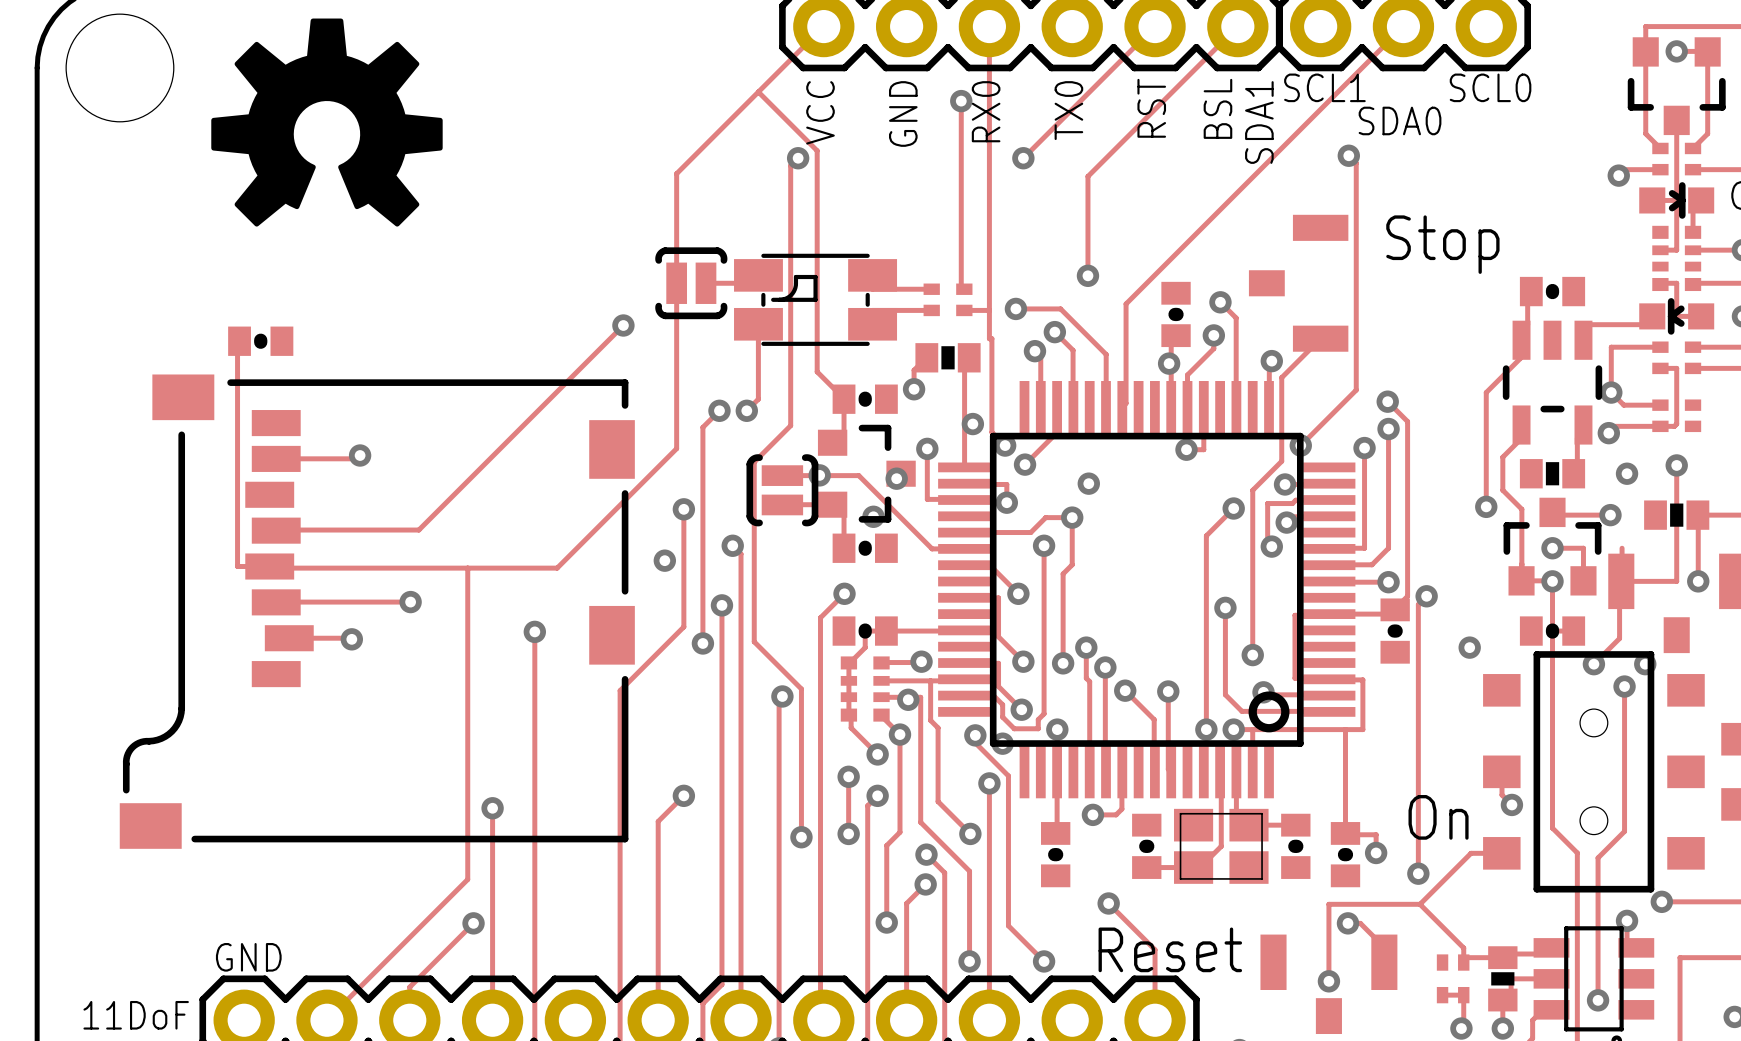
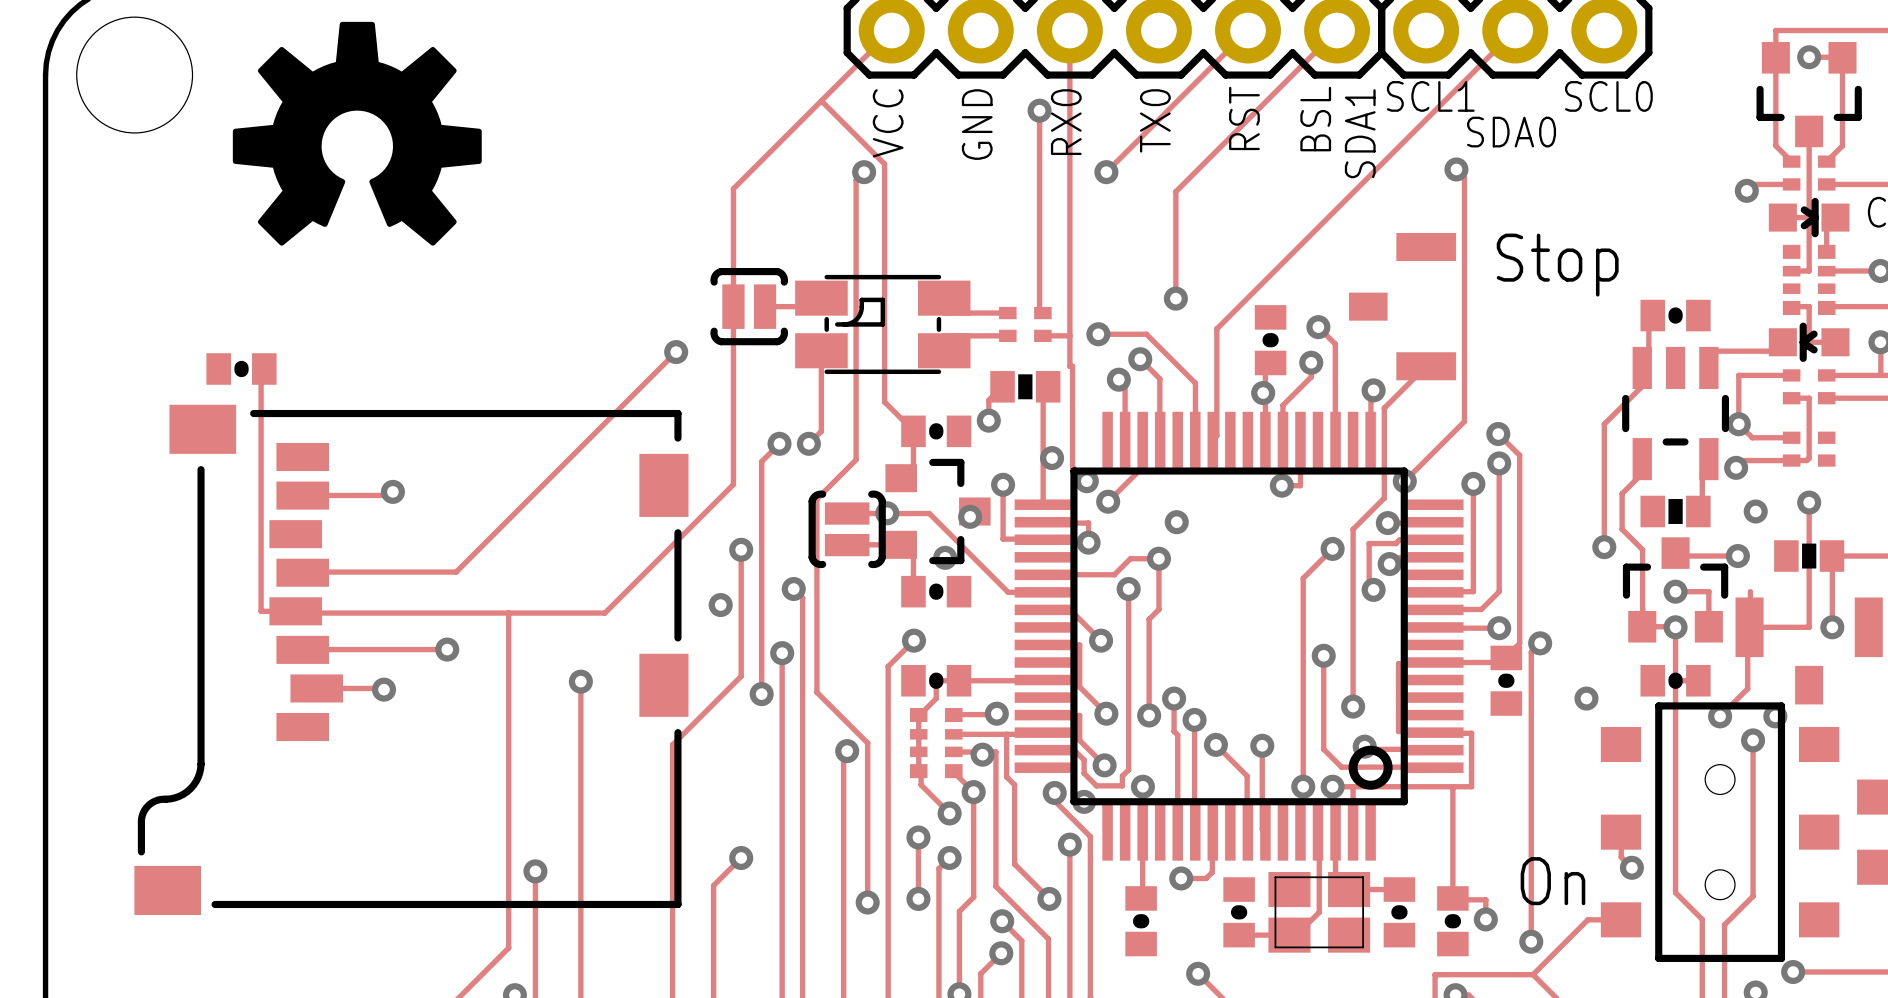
part position: (260, 341) -> (241, 368)

